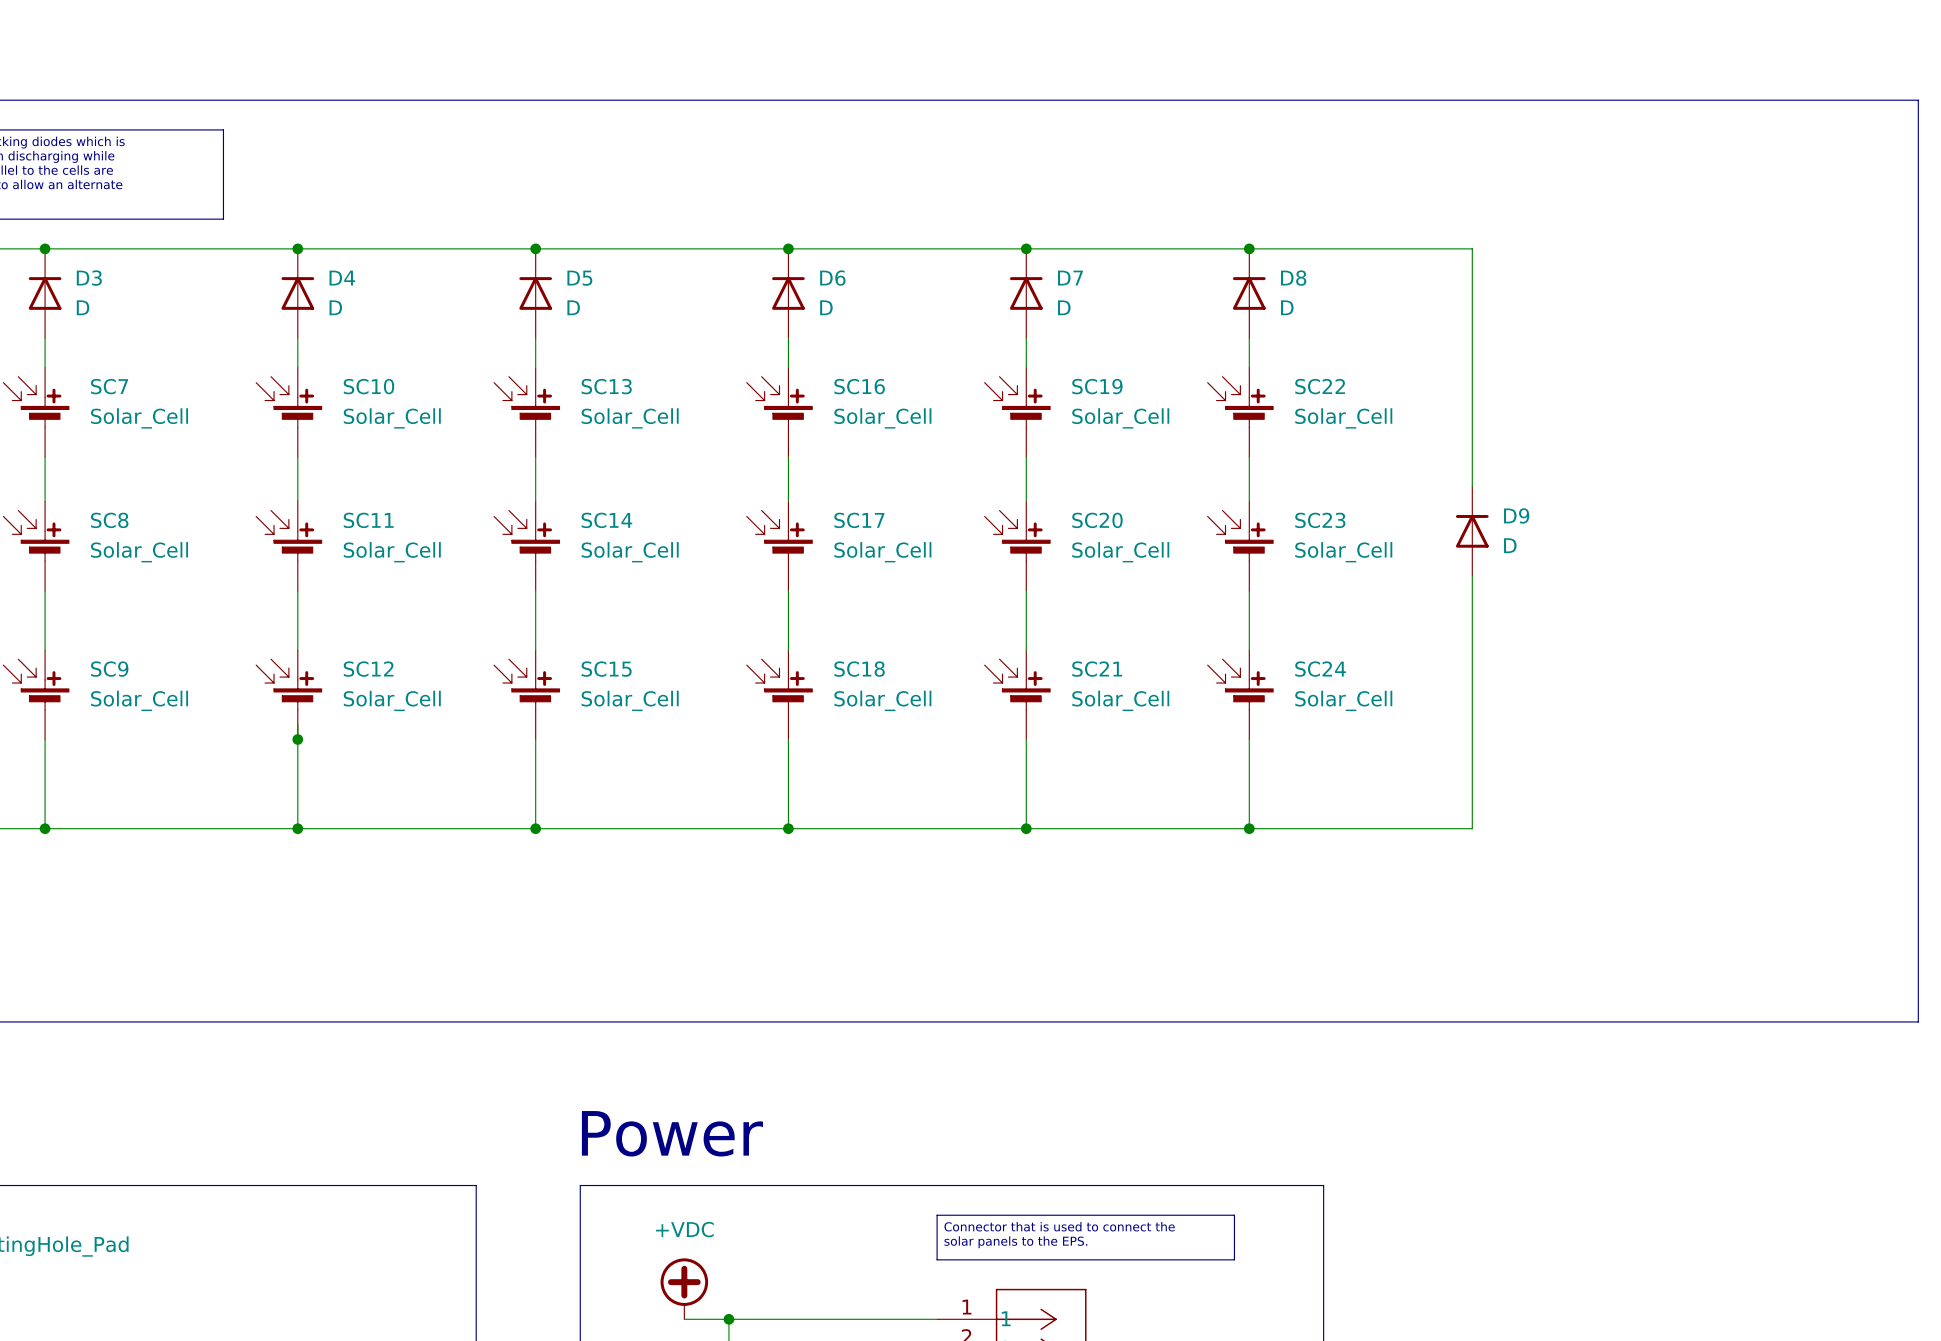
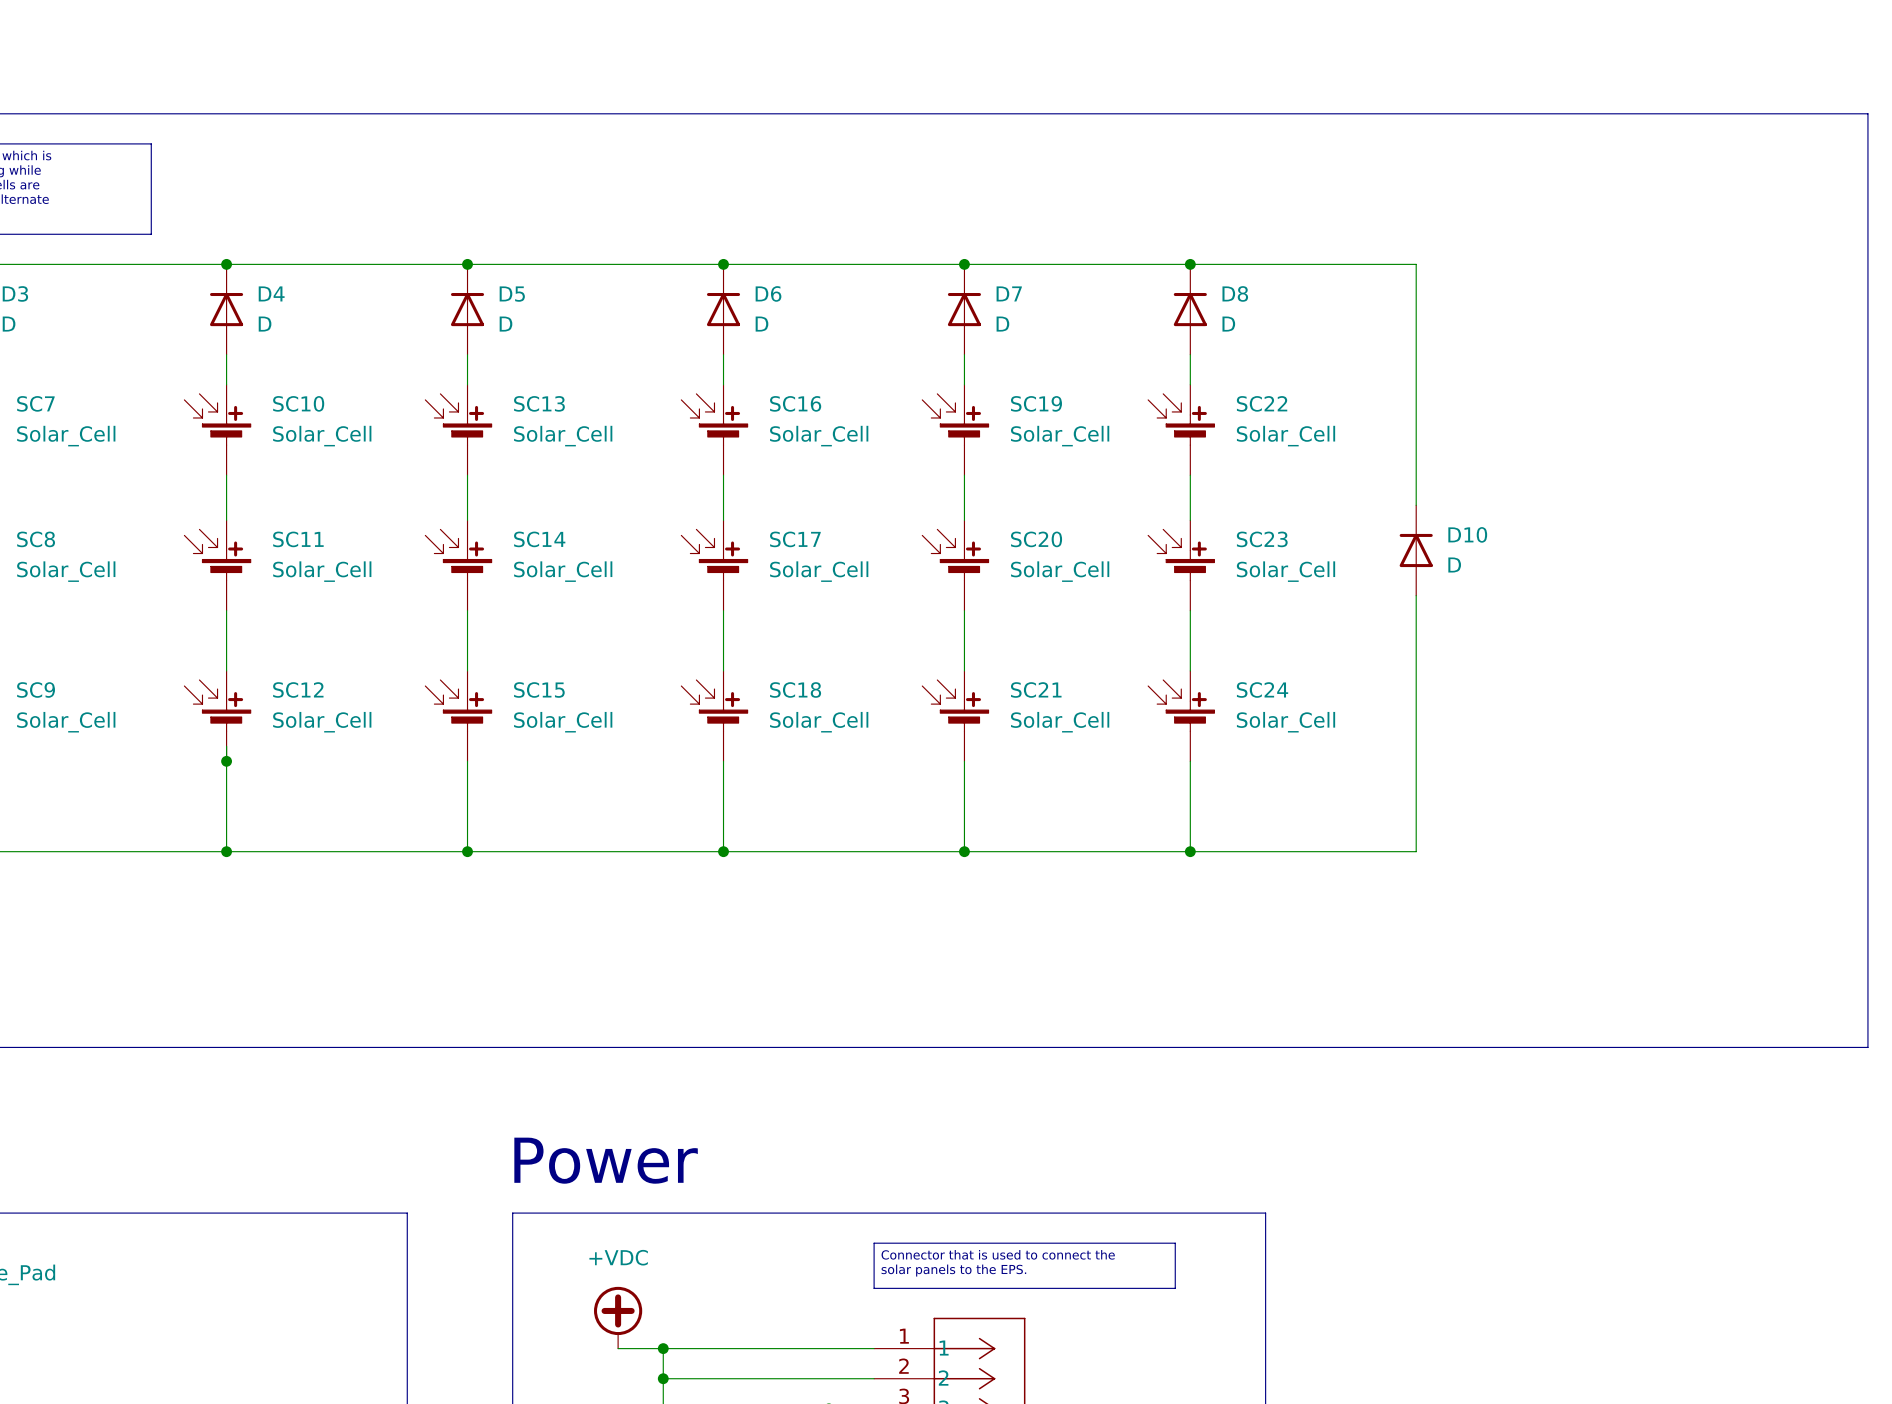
D9 name: D9 (1516, 515) -> D10 (1467, 534)

